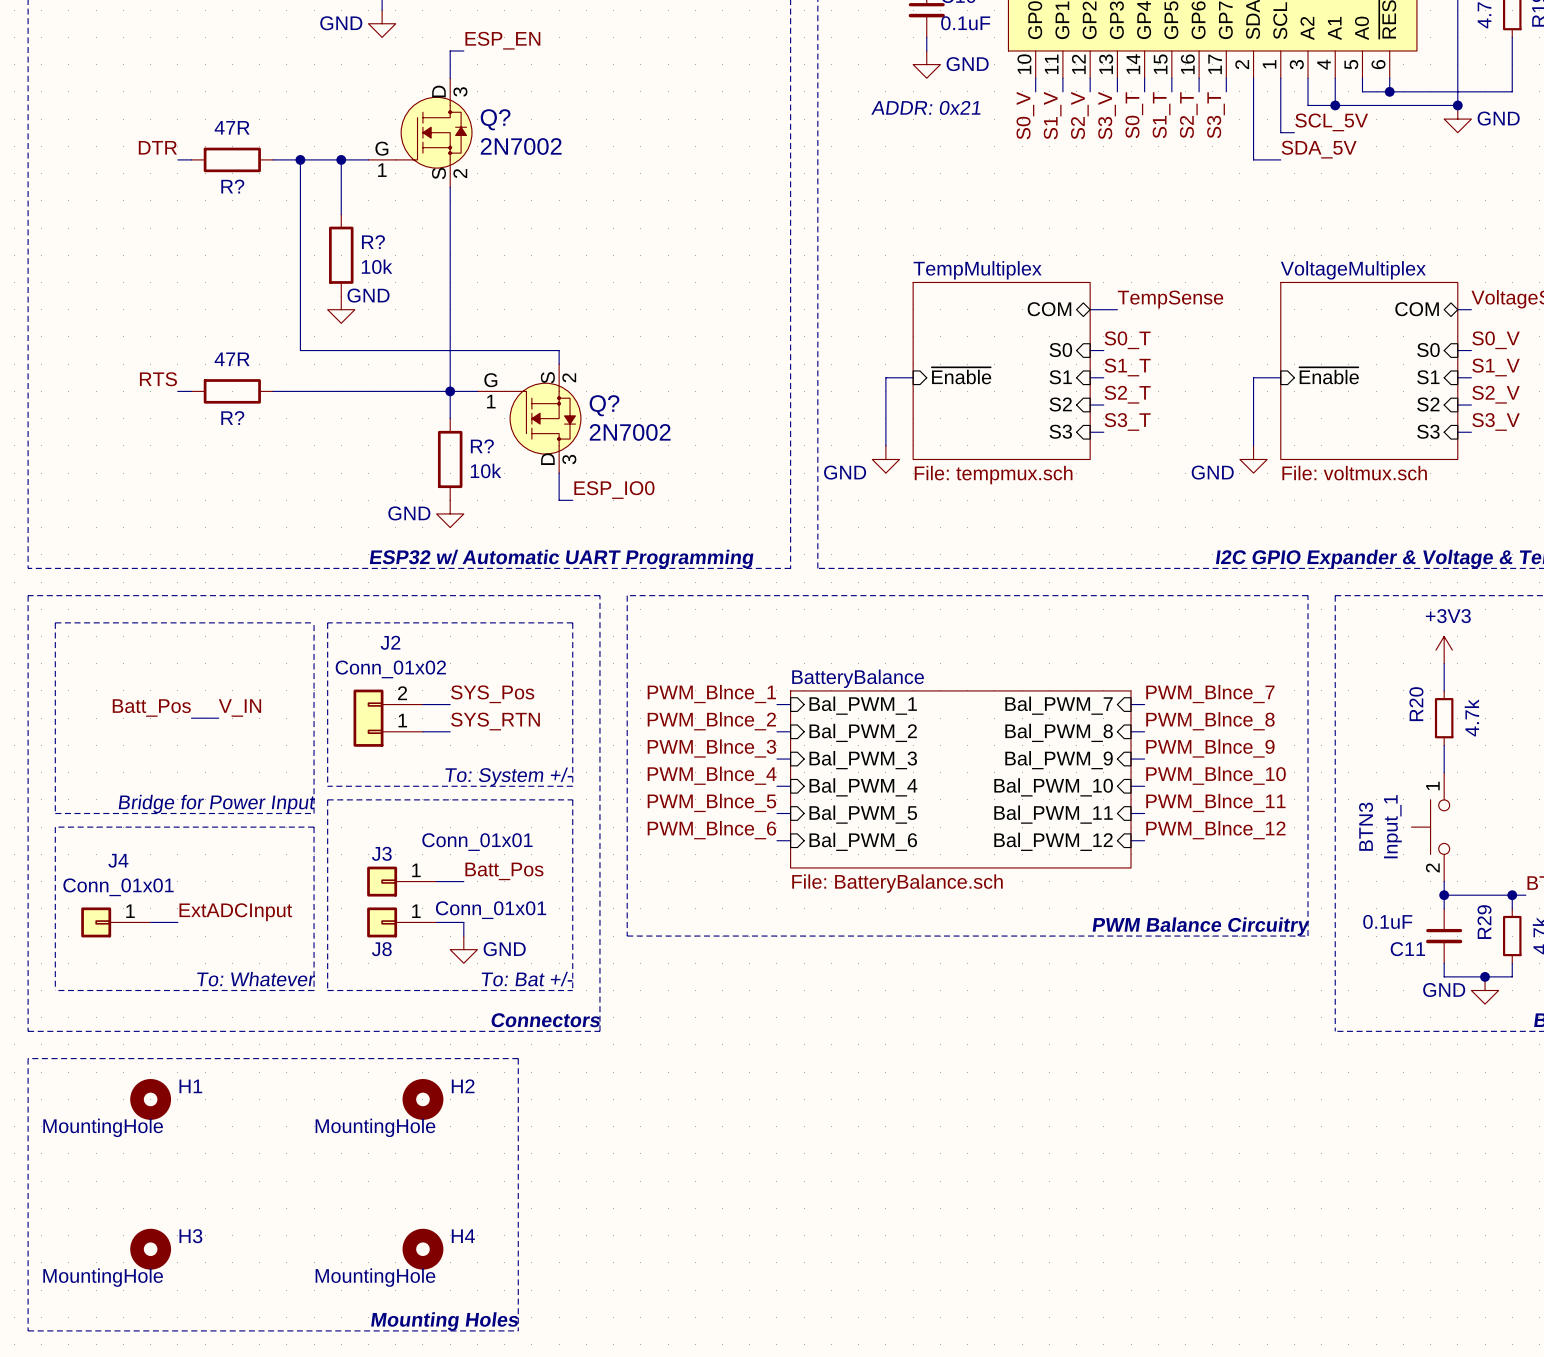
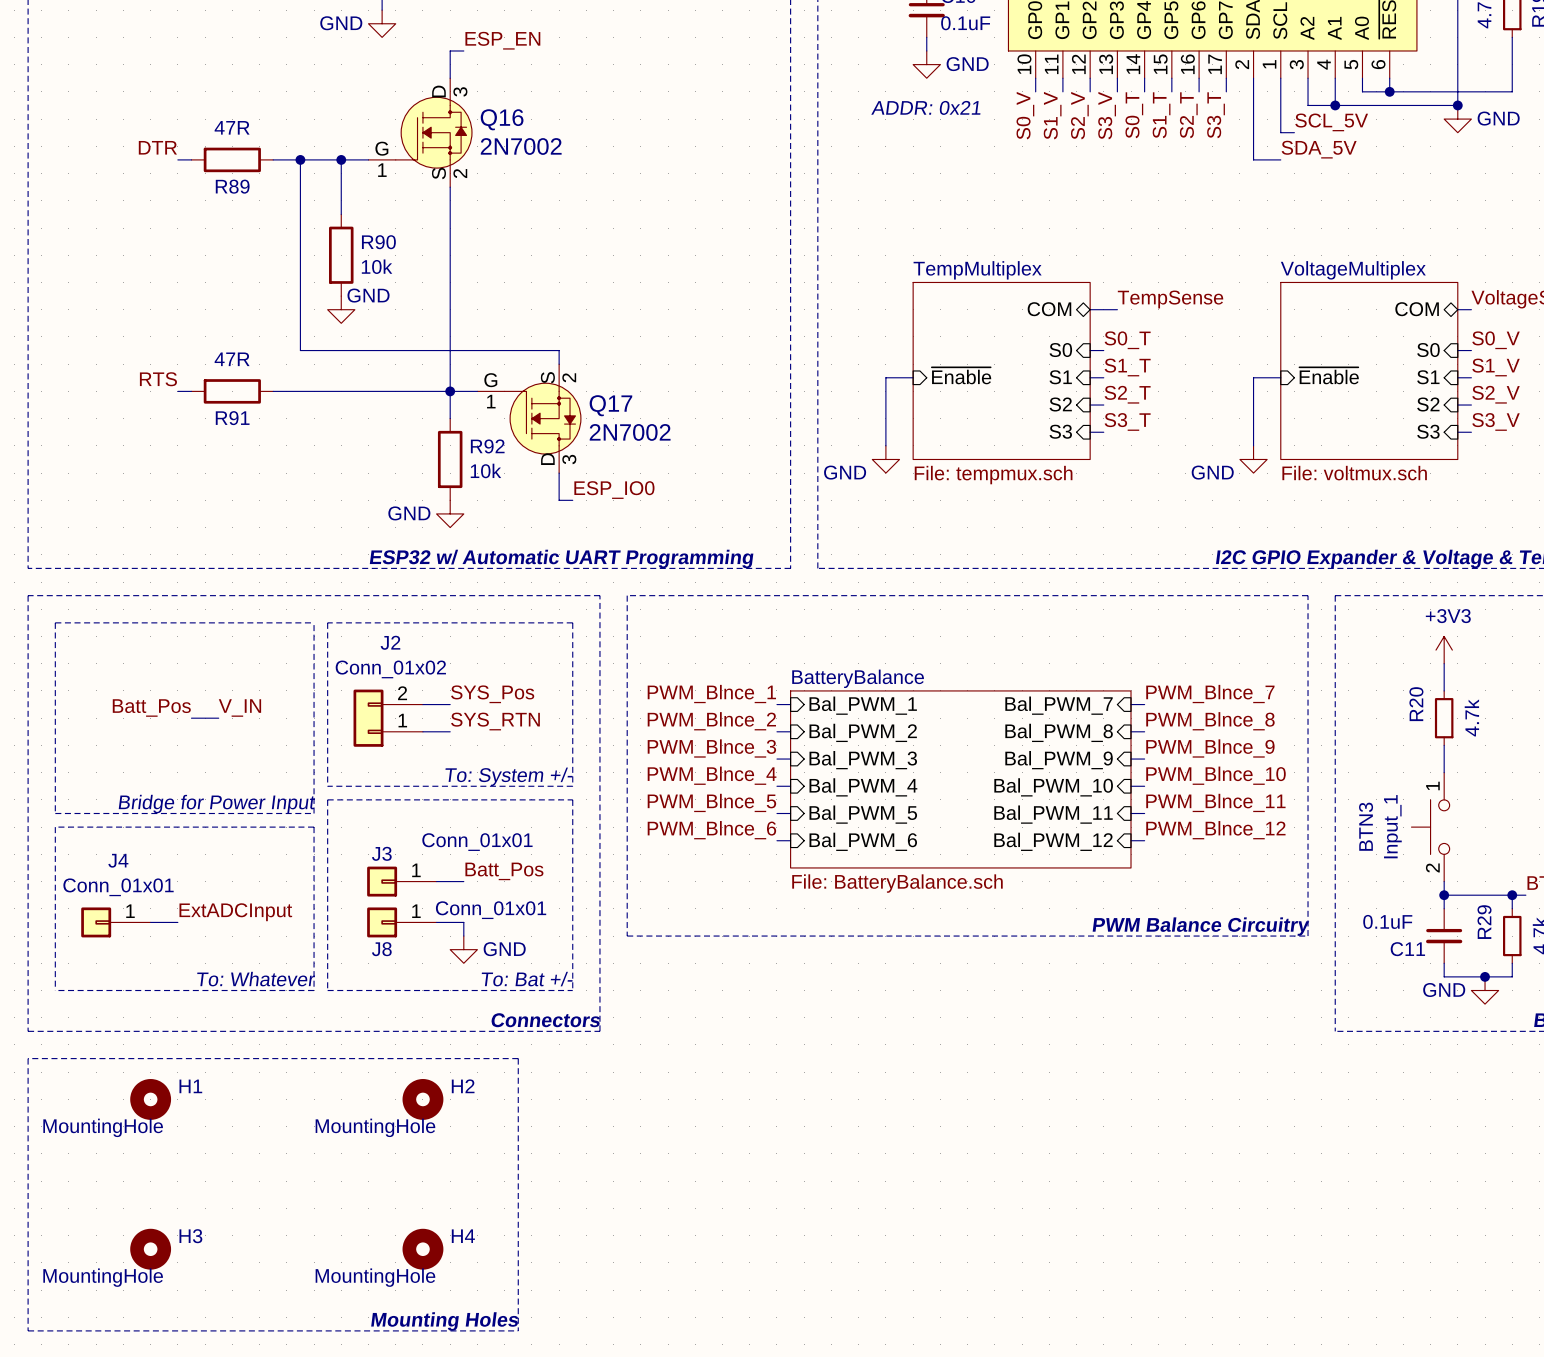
Q? name: Q? (495, 119) -> Q16 (502, 119)
R? name: R? (232, 186) -> R89 (232, 186)
R? name: R? (373, 242) -> R90 (378, 242)
Q? name: Q? (604, 405) -> Q17 (610, 405)
R? name: R? (232, 418) -> R91 (232, 418)
R? name: R? (482, 446) -> R92 (487, 446)

